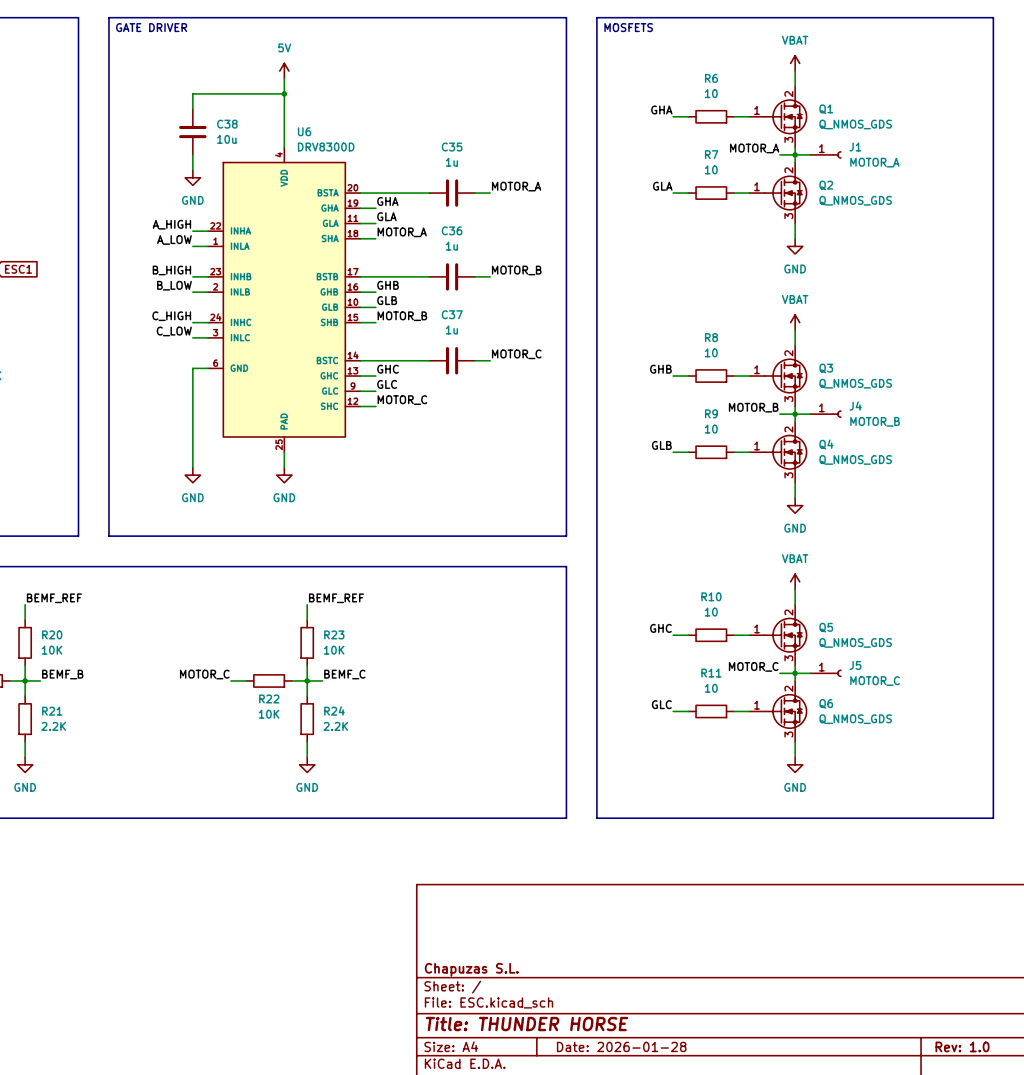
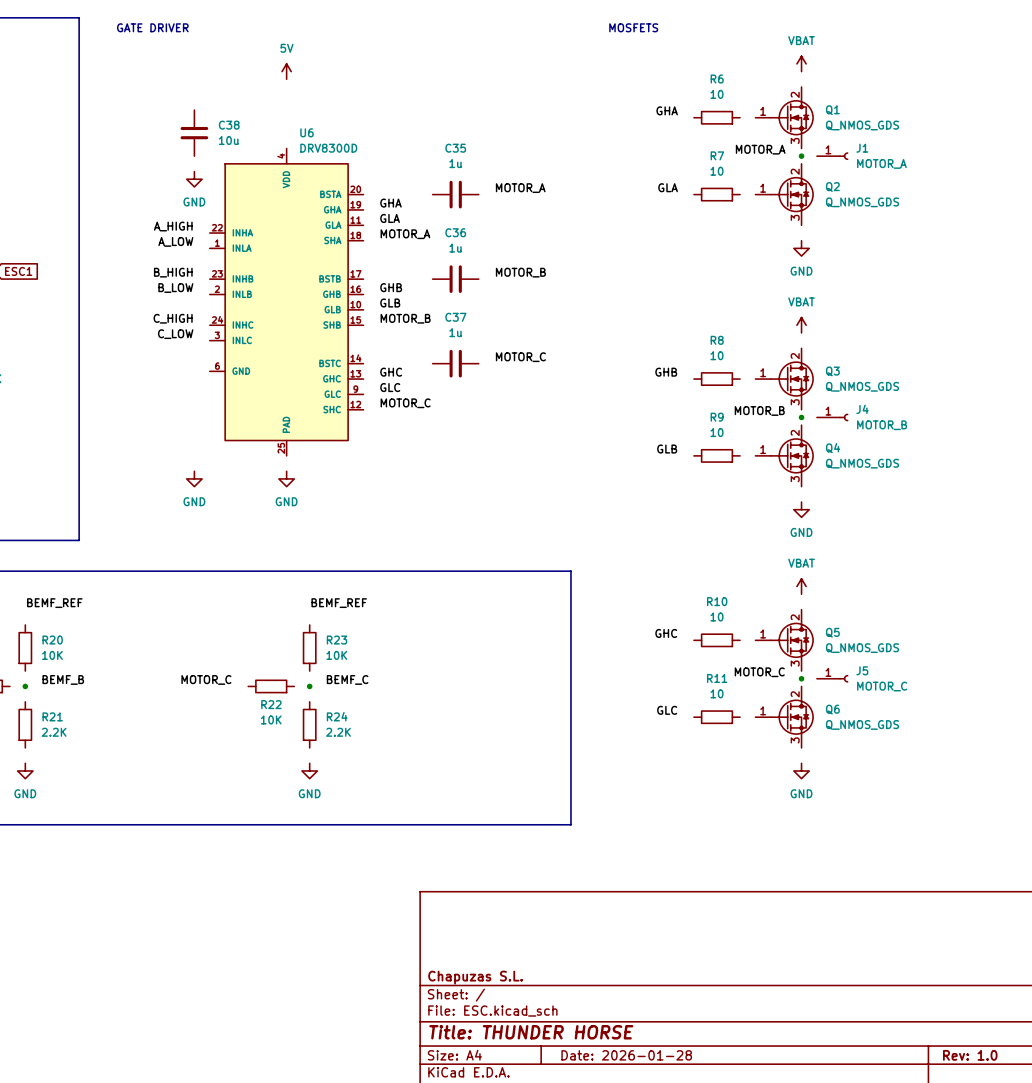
line: (108, 17) (566, 17) (566, 536) (108, 536) (108, 17) -> none
line: (596, 17) (993, 17) (993, 818) (596, 818) (596, 17) -> none
wire: (795, 71) (795, 86) -> none
wire: (284, 78) (284, 147) -> none
wire: (284, 93) (192, 93) (192, 109) -> none
junction: (284, 93) -> none
wire: (673, 116) (688, 116) -> none
wire: (734, 116) (749, 116) -> none
wire: (795, 147) (795, 162) -> none
wire: (192, 154) (192, 170) -> none
wire: (779, 154) (810, 154) -> none
wire: (360, 193) (429, 193) -> none
wire: (474, 193) (490, 193) -> none
wire: (673, 193) (688, 193) -> none
wire: (734, 193) (749, 193) -> none
wire: (360, 208) (375, 208) -> none
wire: (360, 223) (375, 223) -> none
wire: (795, 223) (795, 238) -> none
wire: (192, 231) (208, 231) -> none
wire: (360, 238) (375, 238) -> none
wire: (192, 246) (208, 246) -> none
wire: (192, 276) (208, 276) -> none
wire: (360, 276) (429, 276) -> none
wire: (474, 276) (490, 276) -> none
wire: (192, 292) (208, 292) -> none
wire: (360, 292) (375, 292) -> none
wire: (360, 307) (375, 307) -> none
wire: (192, 322) (208, 322) -> none
wire: (360, 322) (375, 322) -> none
wire: (795, 330) (795, 345) -> none
wire: (192, 337) (208, 337) -> none
wire: (360, 360) (429, 360) -> none
wire: (474, 360) (490, 360) -> none
wire: (208, 368) (192, 368) (192, 467) -> none
wire: (360, 376) (375, 376) -> none
wire: (673, 376) (688, 376) -> none
wire: (734, 376) (749, 376) -> none
wire: (360, 391) (375, 391) -> none
wire: (360, 406) (375, 406) -> none
wire: (795, 406) (795, 421) -> none
wire: (779, 414) (810, 414) -> none
wire: (284, 452) (284, 467) -> none
wire: (673, 452) (688, 452) -> none
wire: (734, 452) (749, 452) -> none
wire: (795, 482) (795, 498) -> none
wire: (795, 589) (795, 604) -> none
wire: (25, 604) (25, 619) -> none
wire: (307, 604) (307, 619) -> none
wire: (673, 635) (688, 635) -> none
wire: (734, 635) (749, 635) -> none
wire: (25, 665) (25, 696) -> none
wire: (307, 665) (307, 696) -> none
wire: (795, 665) (795, 680) -> none
wire: (779, 673) (810, 673) -> none
wire: (9, 680) (40, 680) -> none
wire: (230, 680) (246, 680) -> none
wire: (291, 680) (322, 680) -> none
wire: (673, 711) (688, 711) -> none
wire: (734, 711) (749, 711) -> none
wire: (25, 741) (25, 757) -> none
wire: (307, 741) (307, 757) -> none
wire: (795, 741) (795, 757) -> none

